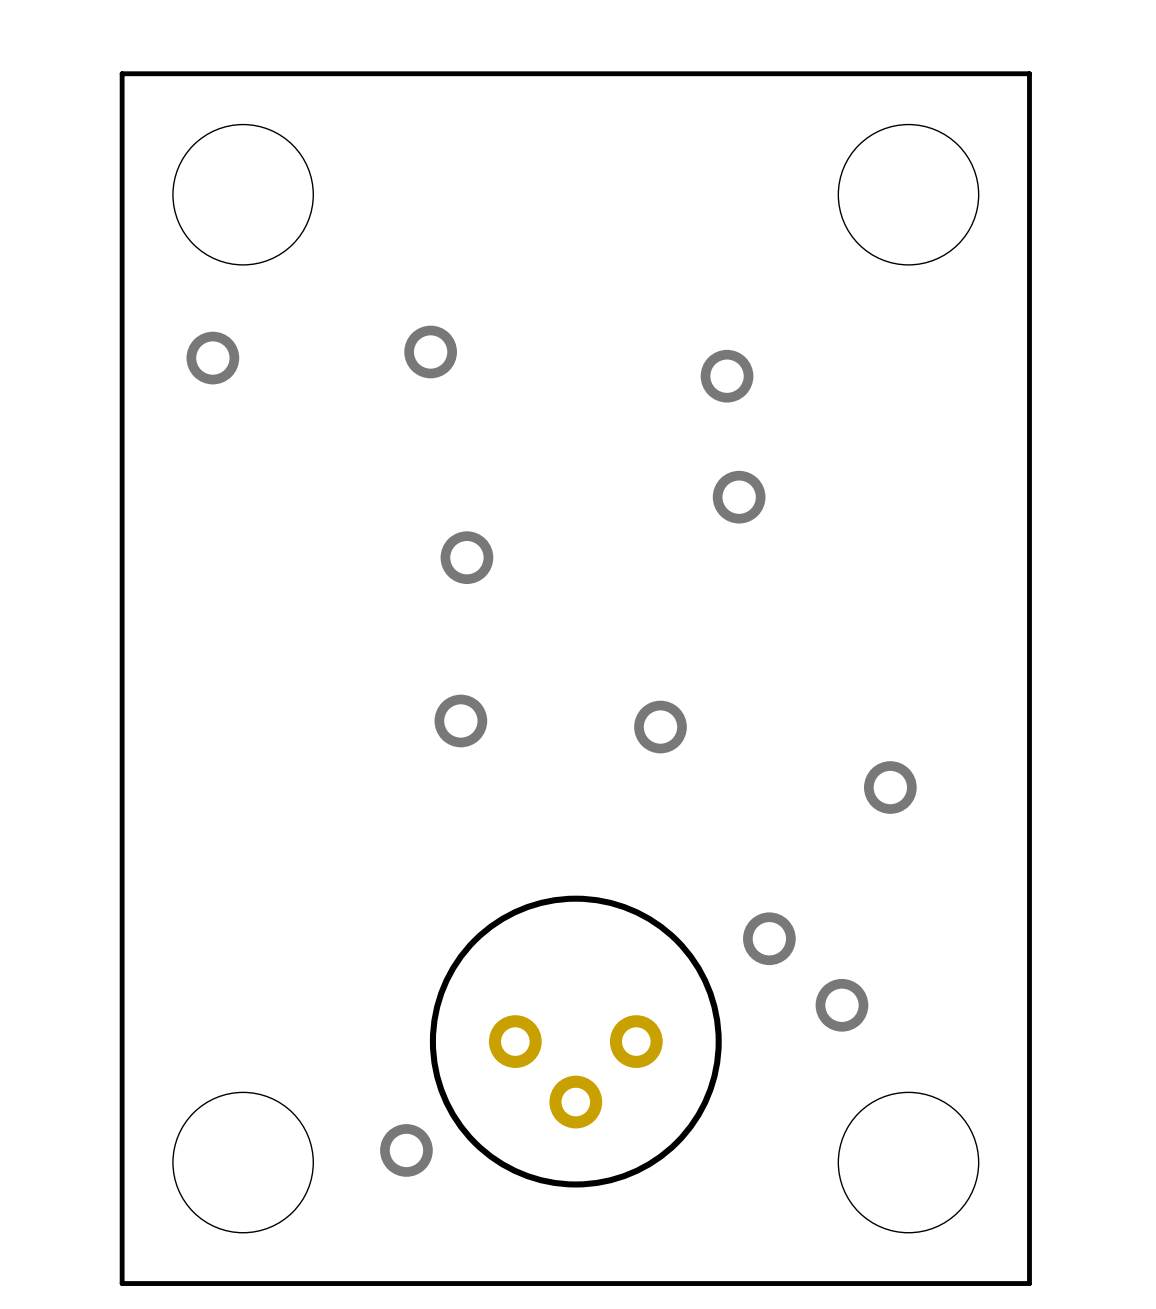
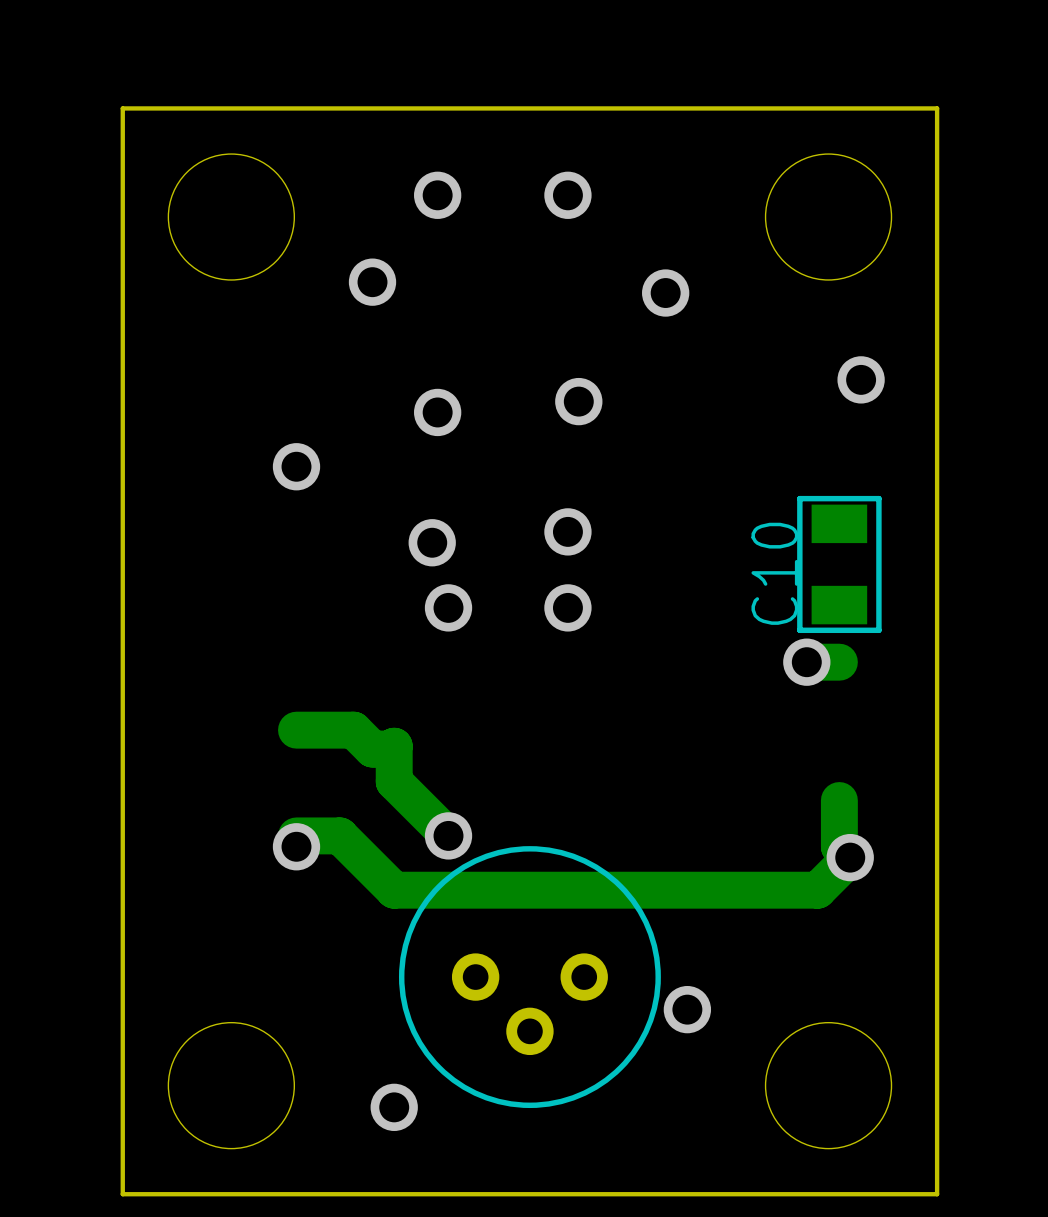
via: none -> (437, 195)
via: none -> (567, 195)
via: none -> (372, 282)
via: none -> (665, 293)
via: (430, 352) -> none
via: (212, 358) -> none
via: (727, 376) -> none
via: none -> (861, 379)
via: none -> (578, 401)
via: none -> (437, 412)
via: none -> (296, 466)
via: (739, 497) -> none
via: none -> (567, 531)
C10: none -> (839, 564)
via: none -> (448, 607)
via: none -> (567, 607)
via: none -> (806, 662)
track: none -> (839, 662) (806, 662)
via: (460, 720) -> none
via: (660, 727) -> none
track: none -> (296, 730) (353, 730) (372, 749) (391, 749) (394, 746) (394, 781) (448, 835)
via: (890, 787) -> none
track: none -> (839, 800) (839, 846) (850, 857) (817, 890) (394, 890) (339, 835) (296, 835)
via: none -> (448, 835)
via: none -> (296, 846)
via: none -> (850, 857)
via: (769, 938) -> none
via: (841, 1005) -> none
via: none -> (687, 1009)
via position: (406, 1150) -> (394, 1107)

